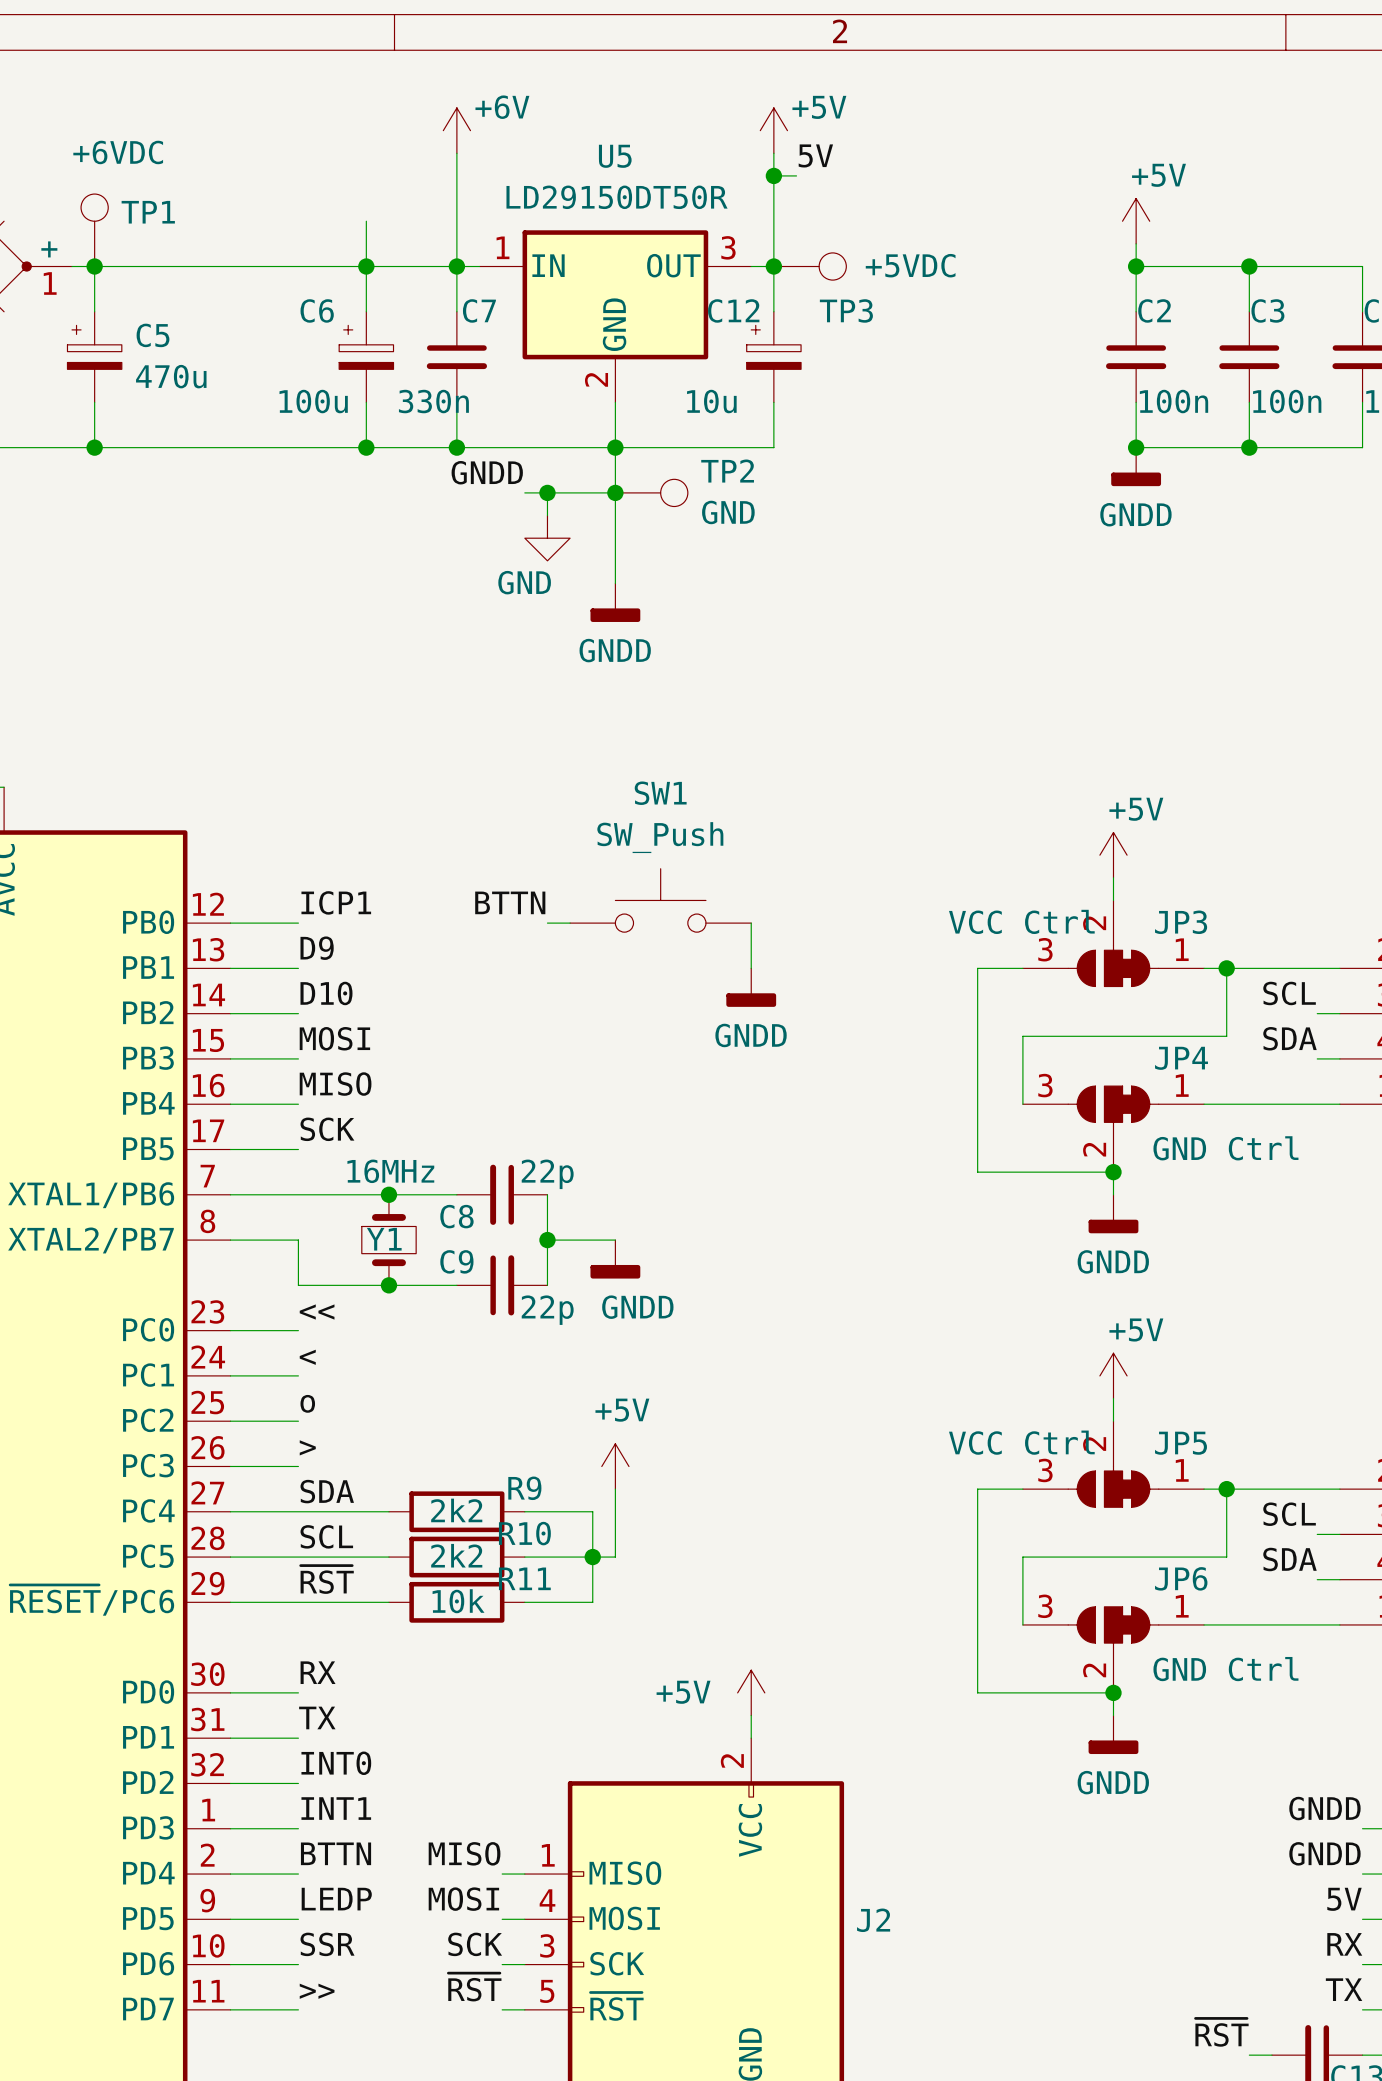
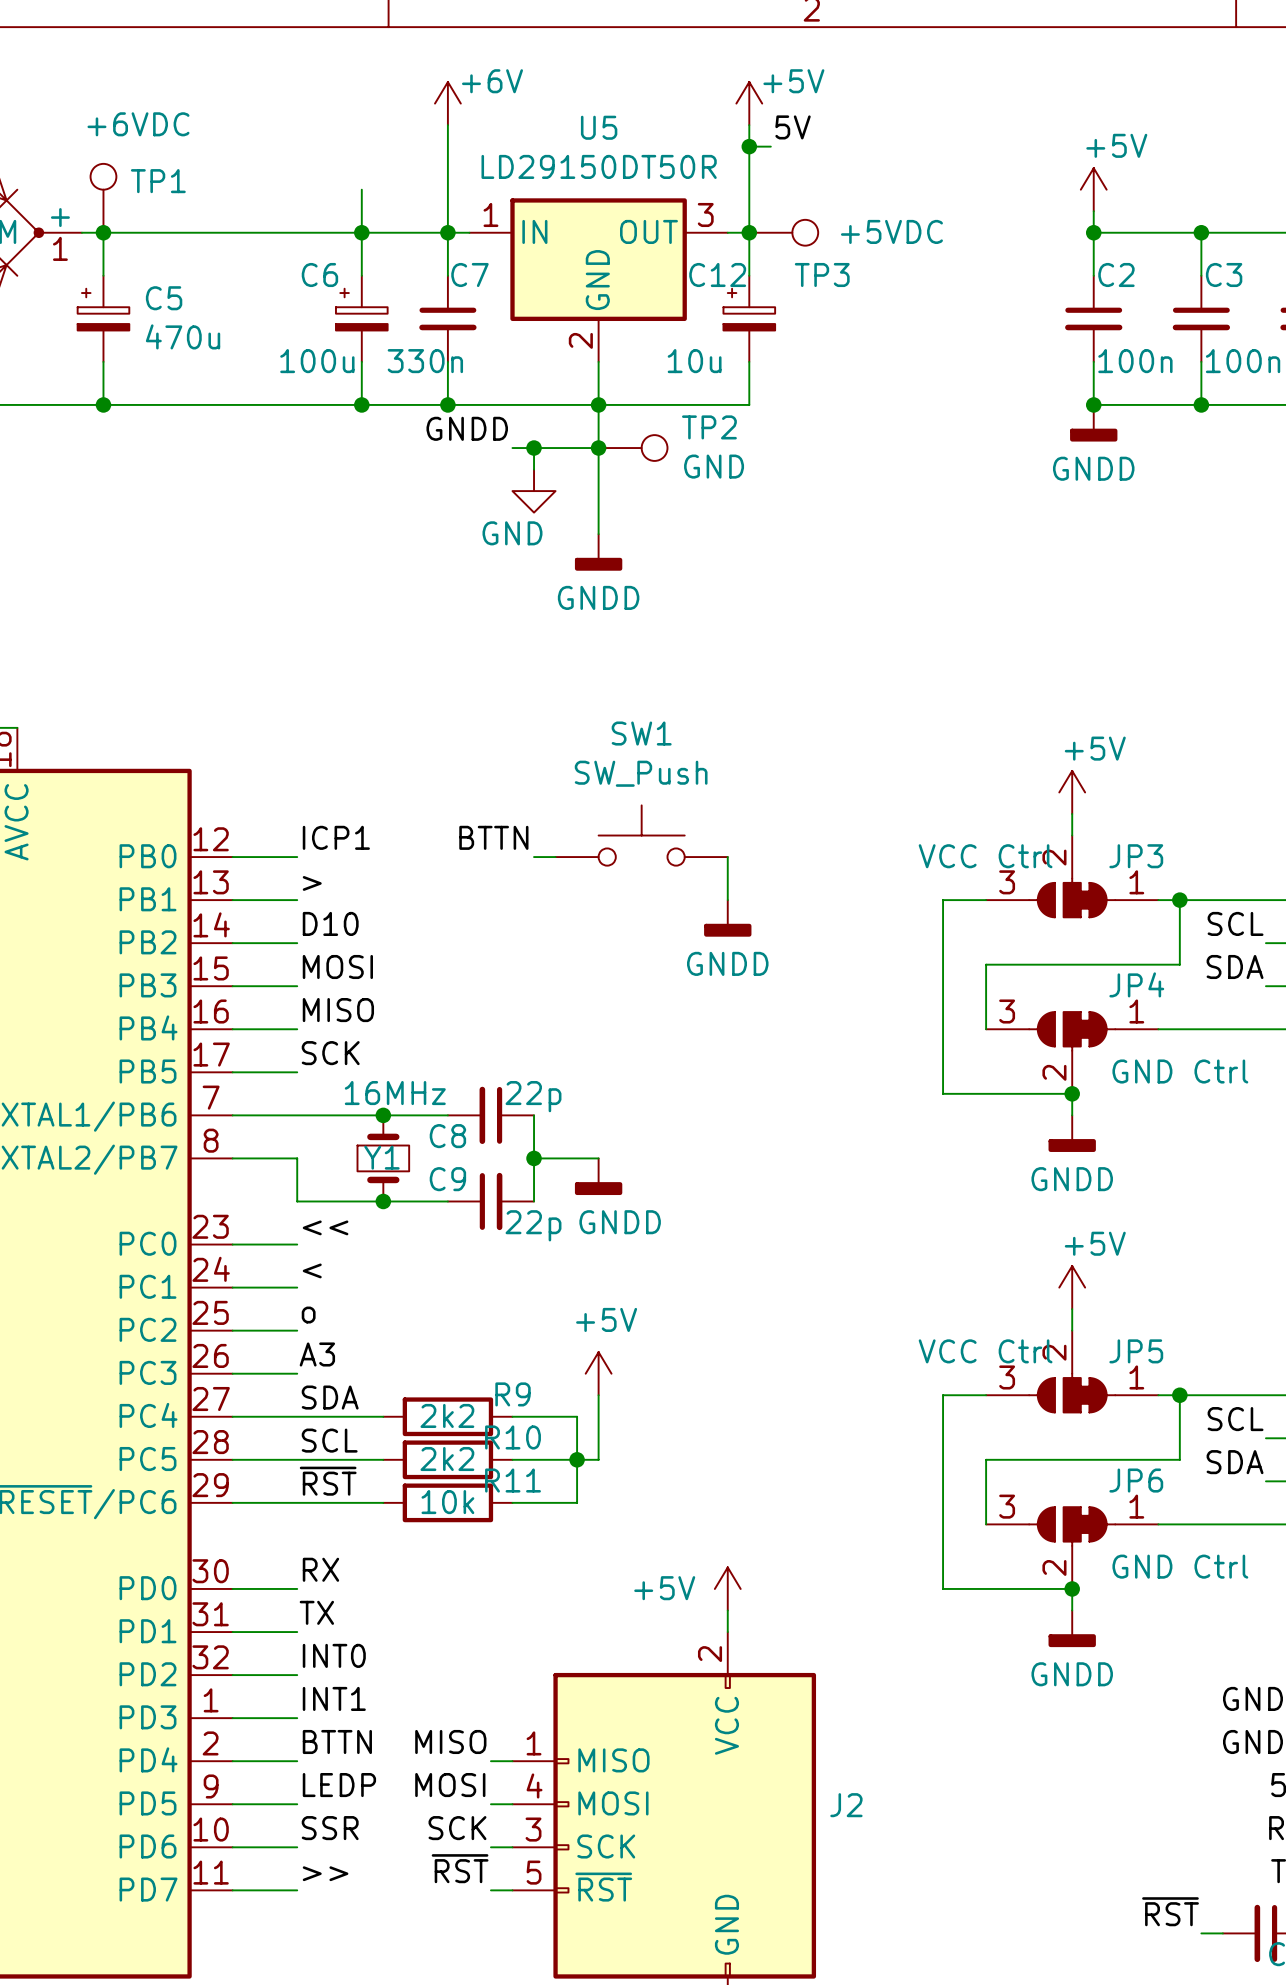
label: D9 (317, 948) -> > (312, 883)
label: > (307, 1447) -> A3 (317, 1354)

